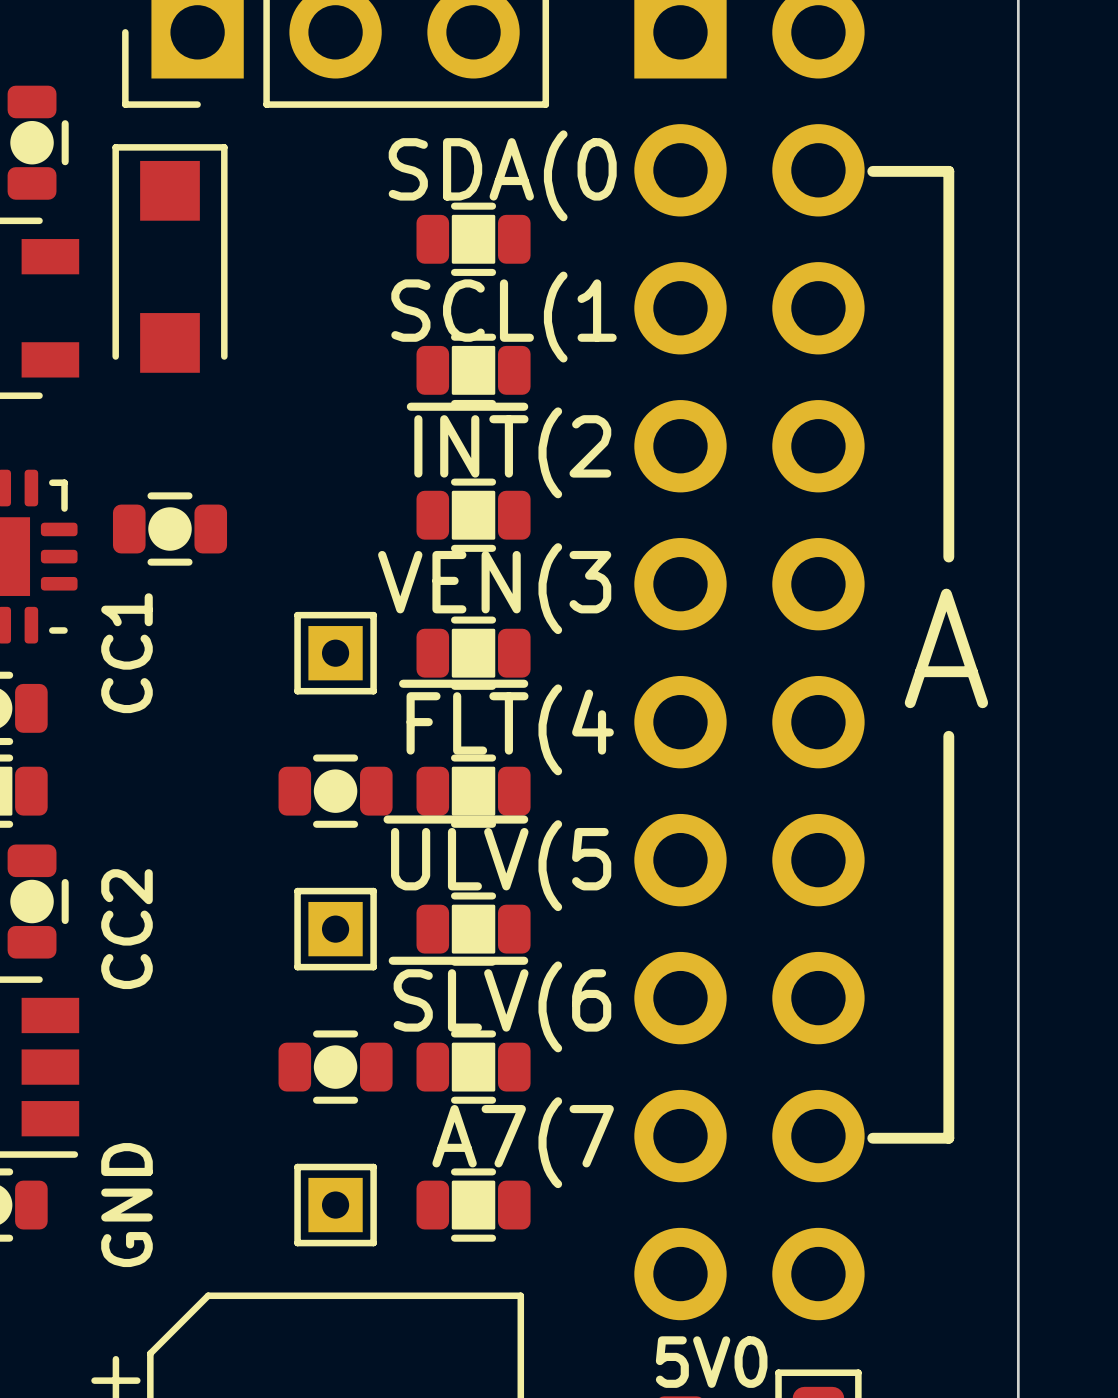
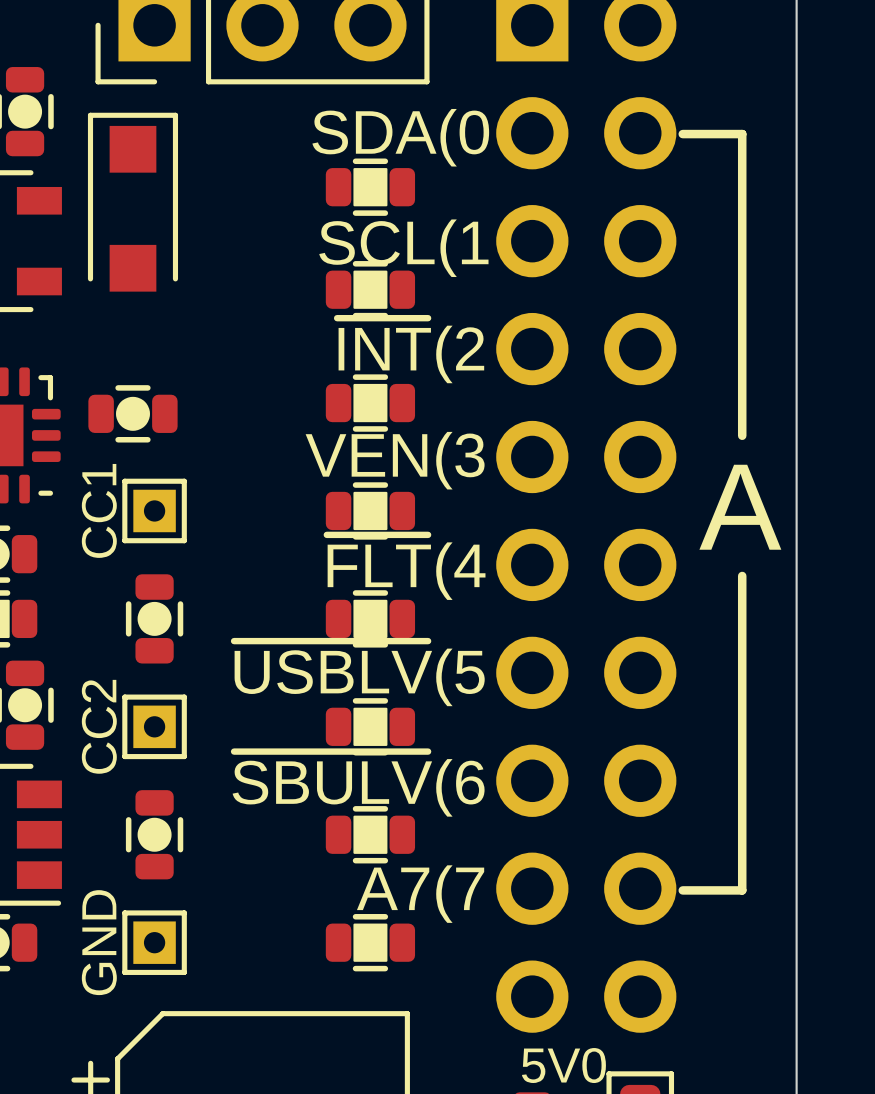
part position: (335, 653) -> (154, 510)
part rotation: 0° (335, 791) -> 90° clockwise (154, 618)
part position: (335, 791) -> (154, 618)
text: ~{ULV}(5 (497, 863) -> ~{USBLV}(5 (359, 673)
part position: (335, 929) -> (154, 726)
text: ~{SLV}(6 (499, 1004) -> ~{SBULV}(6 (358, 784)
part rotation: 0° (335, 1067) -> 90° clockwise (154, 834)
part position: (335, 1067) -> (154, 834)
part position: (335, 1205) -> (154, 942)

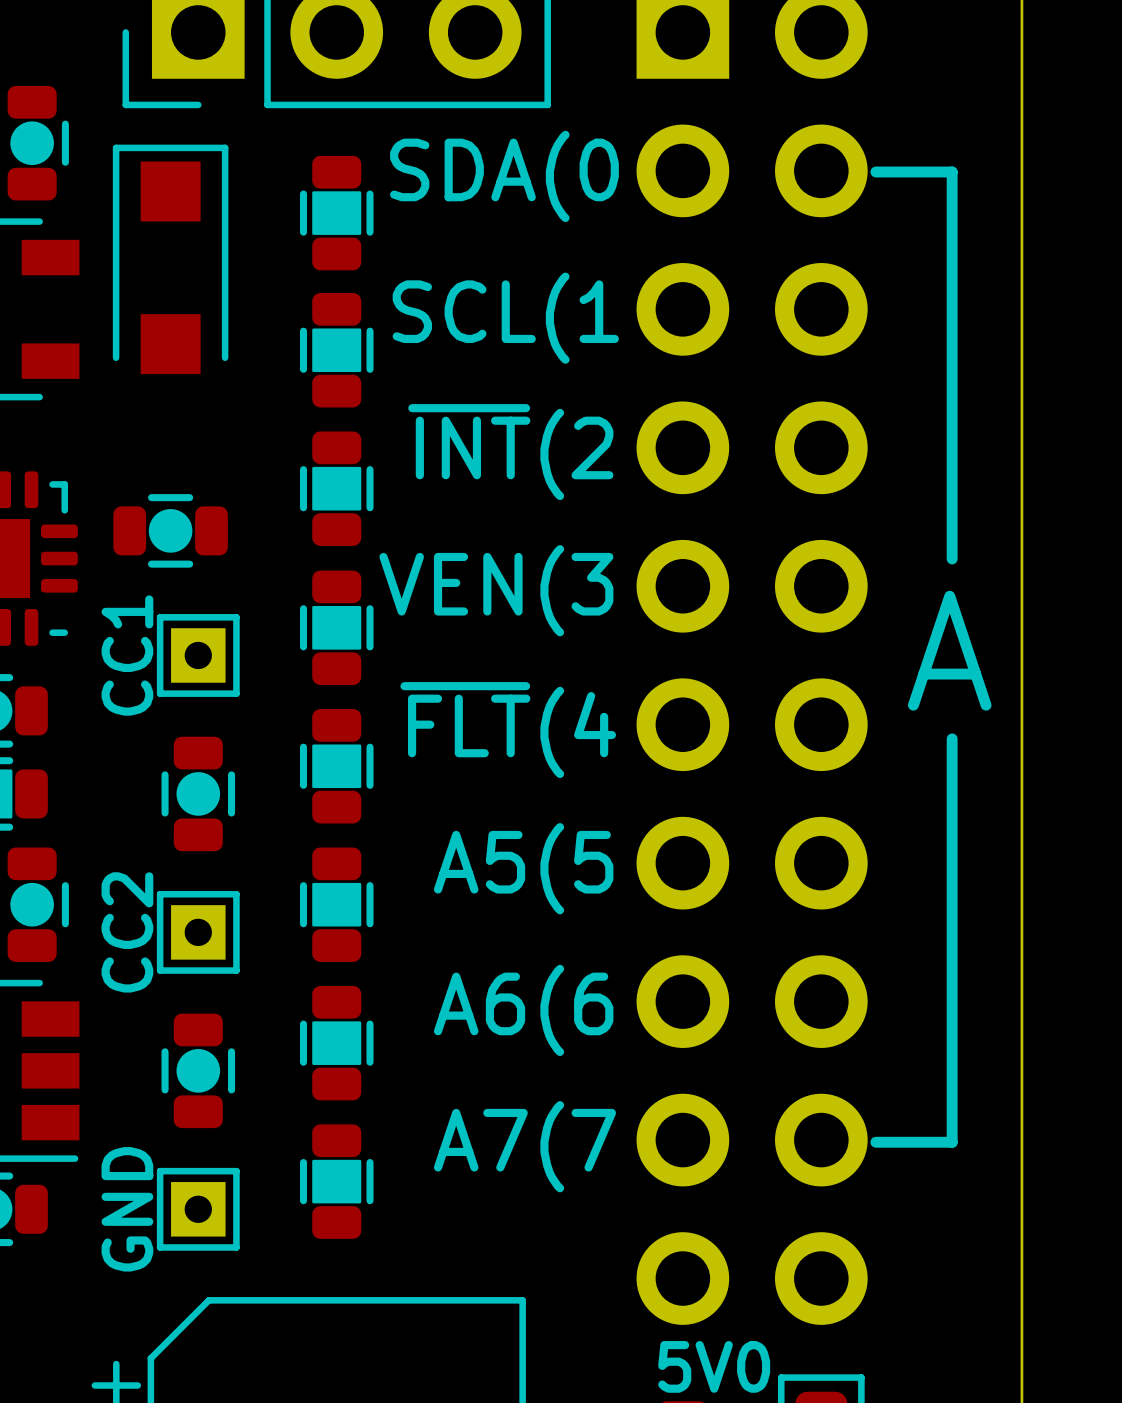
part: none -> (336, 213)
part: (370, 187) -> none
part: none -> (336, 350)
part: (370, 289) -> none
part: none -> (336, 488)
part: (370, 403) -> none
part: none -> (336, 627)
part: (370, 510) -> none
part: none -> (336, 766)
part: (370, 618) -> none
text: ~{USBLV}(5 (359, 673) -> A5(5 (523, 868)
part: none -> (336, 904)
part: (370, 726) -> none
text: ~{SBULV}(6 (358, 784) -> A6(6 (523, 1010)
part: none -> (336, 1043)
part: (370, 834) -> none
part: none -> (336, 1181)
part: (370, 942) -> none

